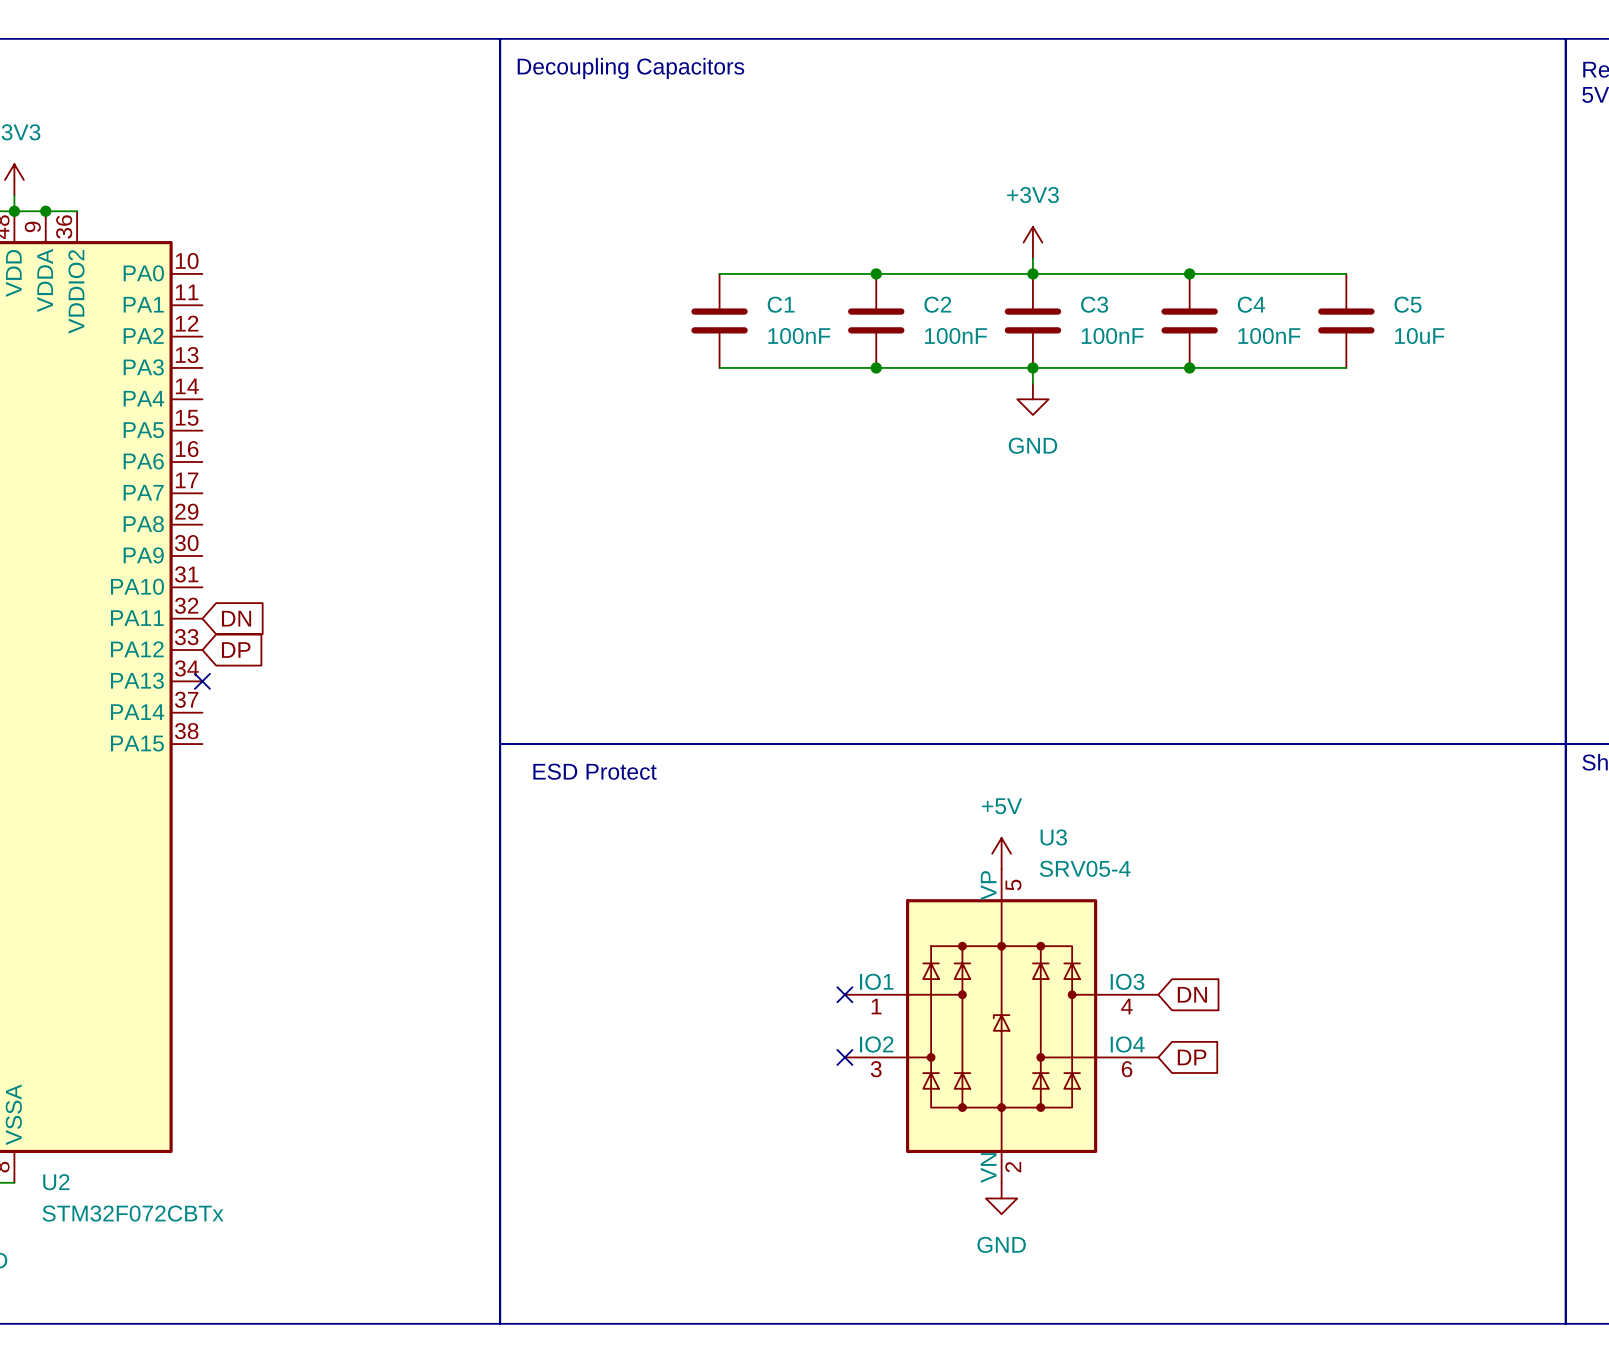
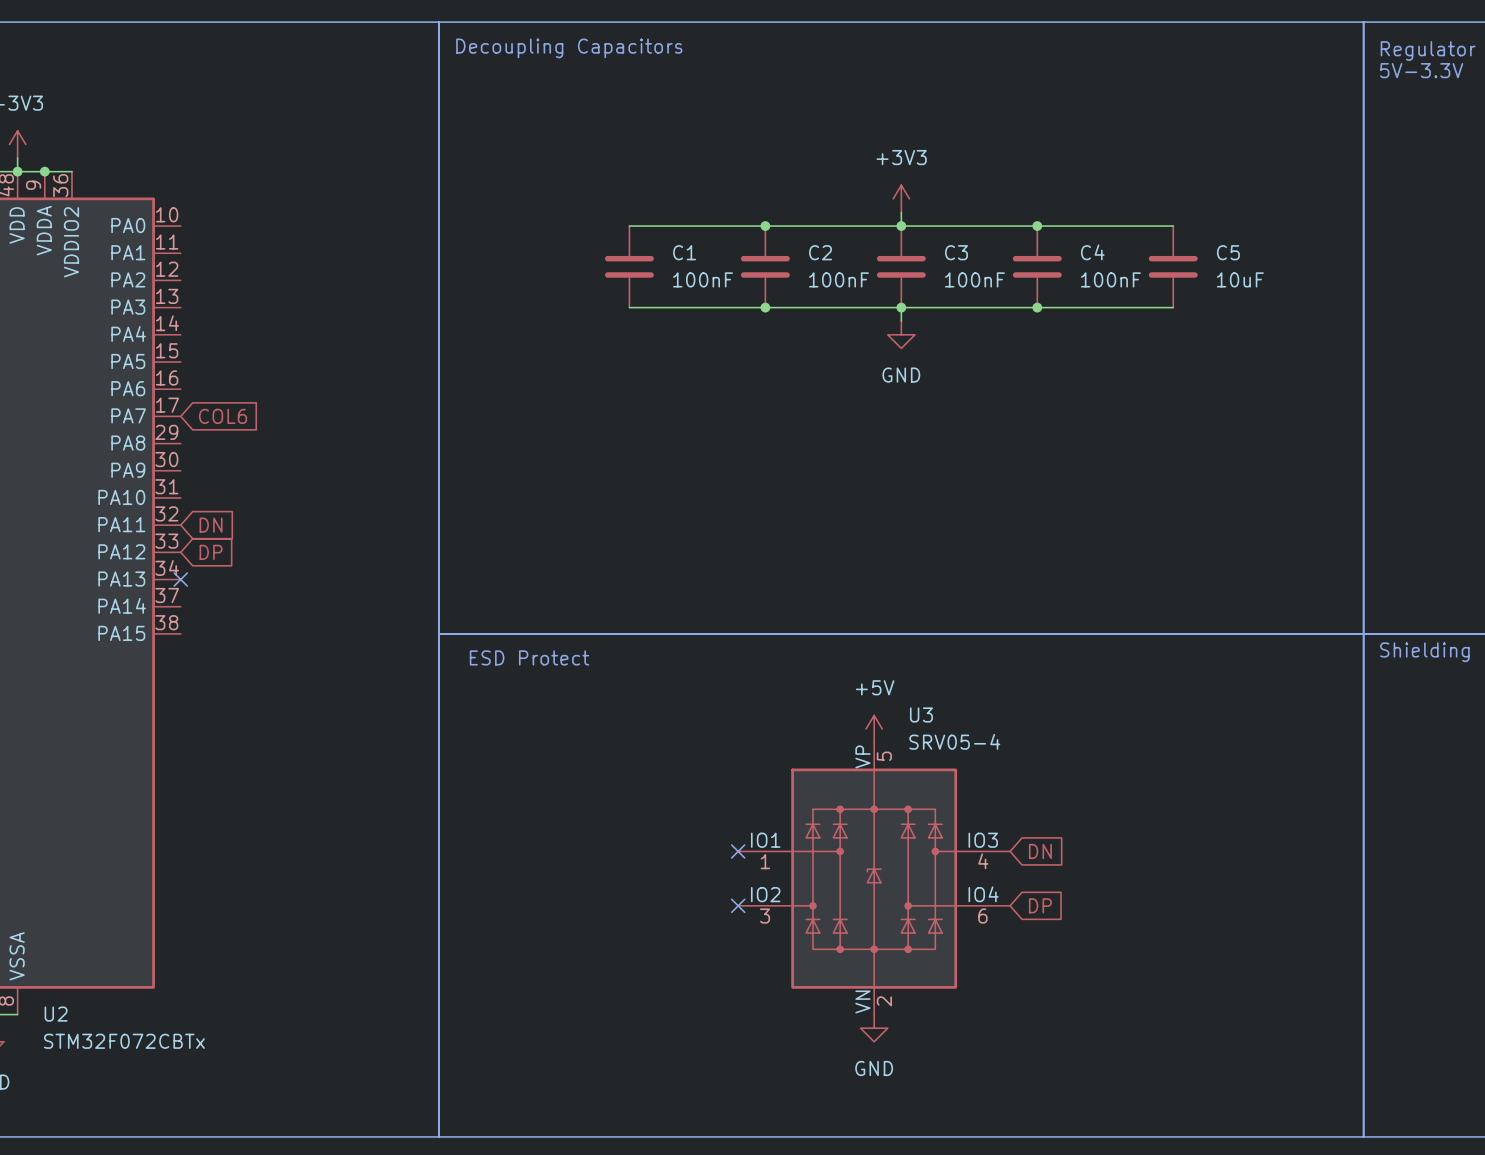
global label: none -> COL6 (223, 416)

